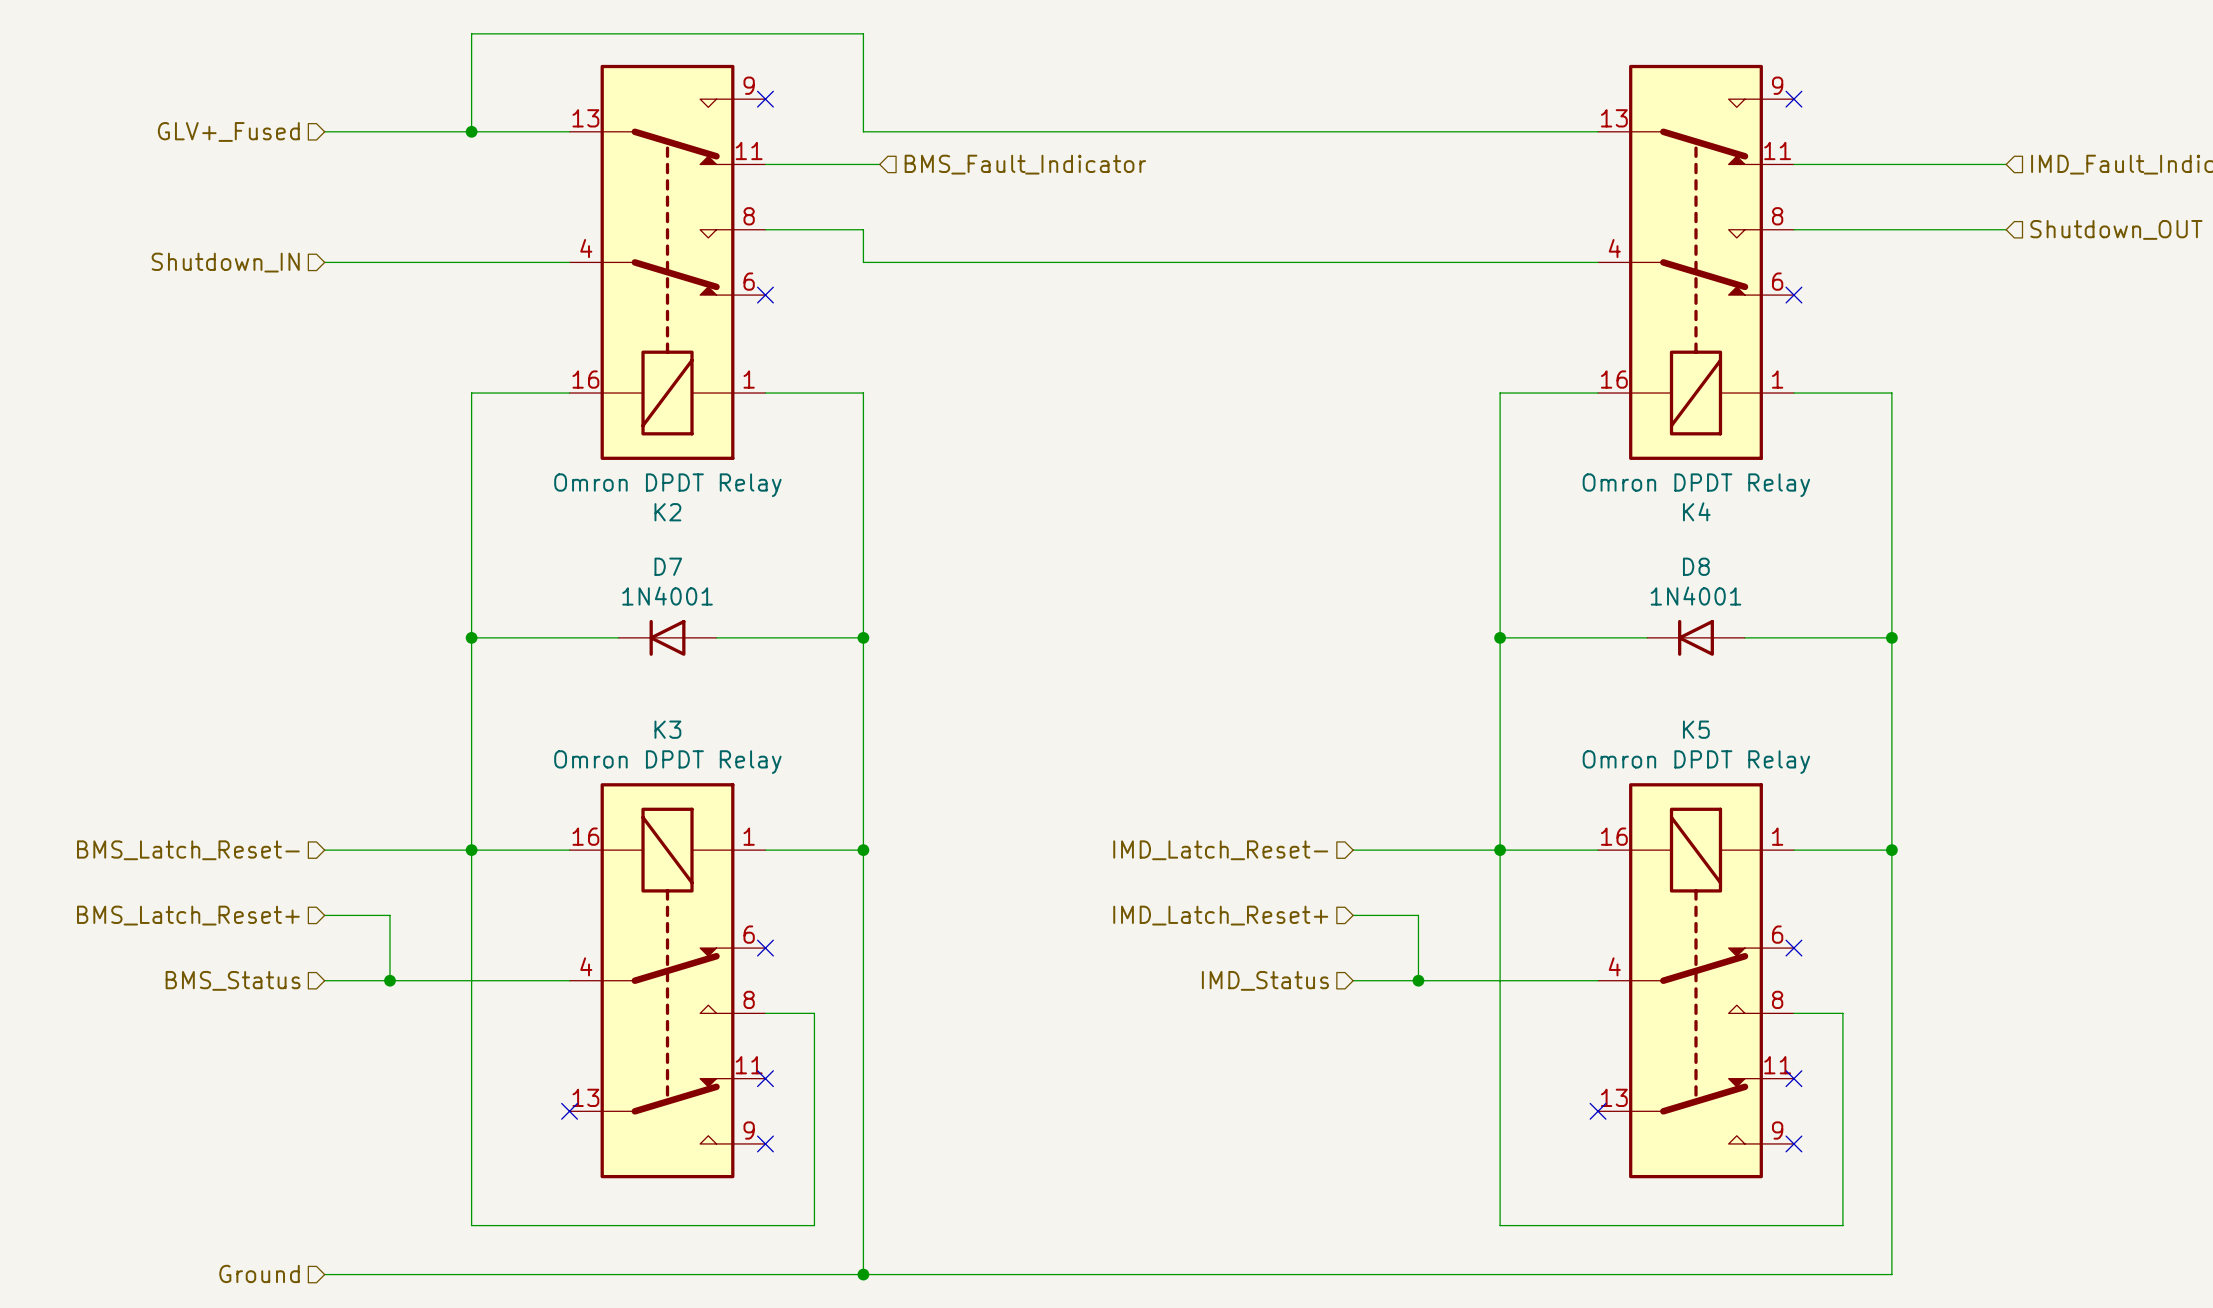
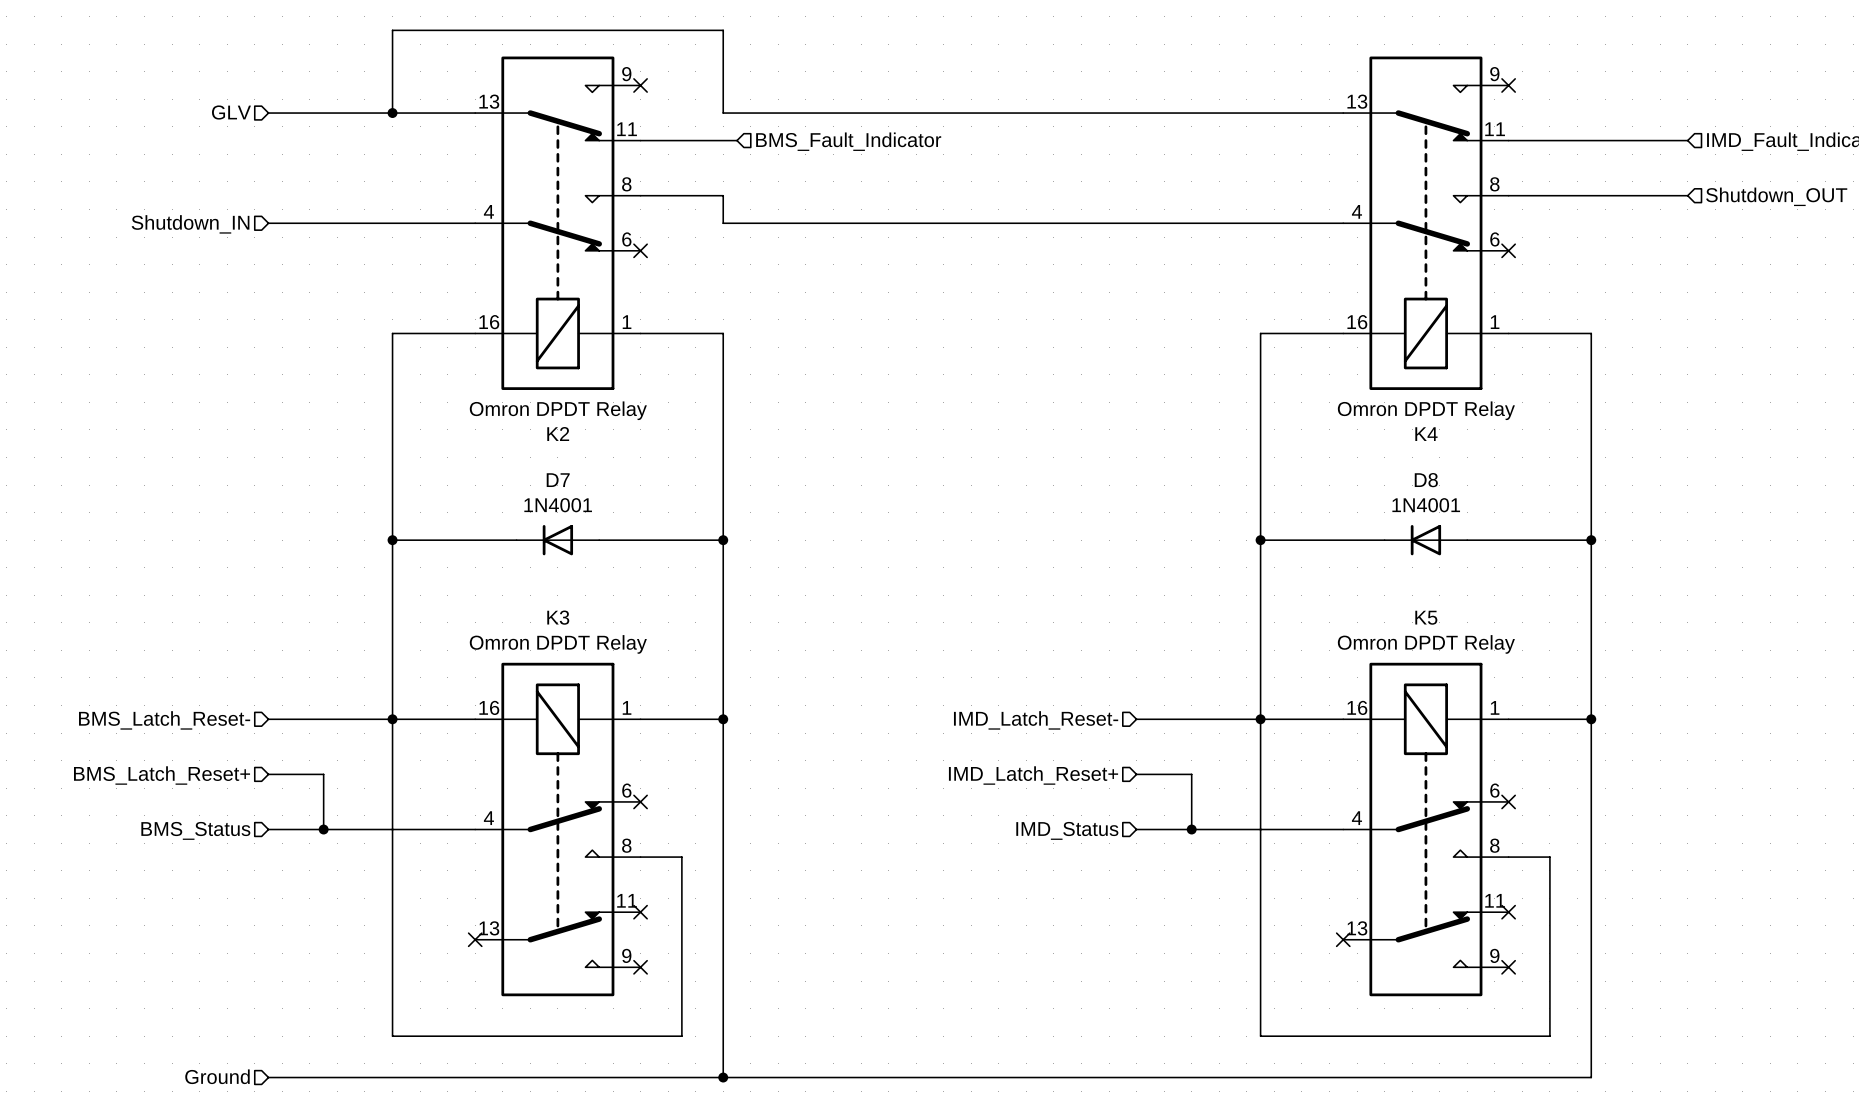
hierarchical label: GLV+_Fused (228, 131) -> GLV (231, 112)

